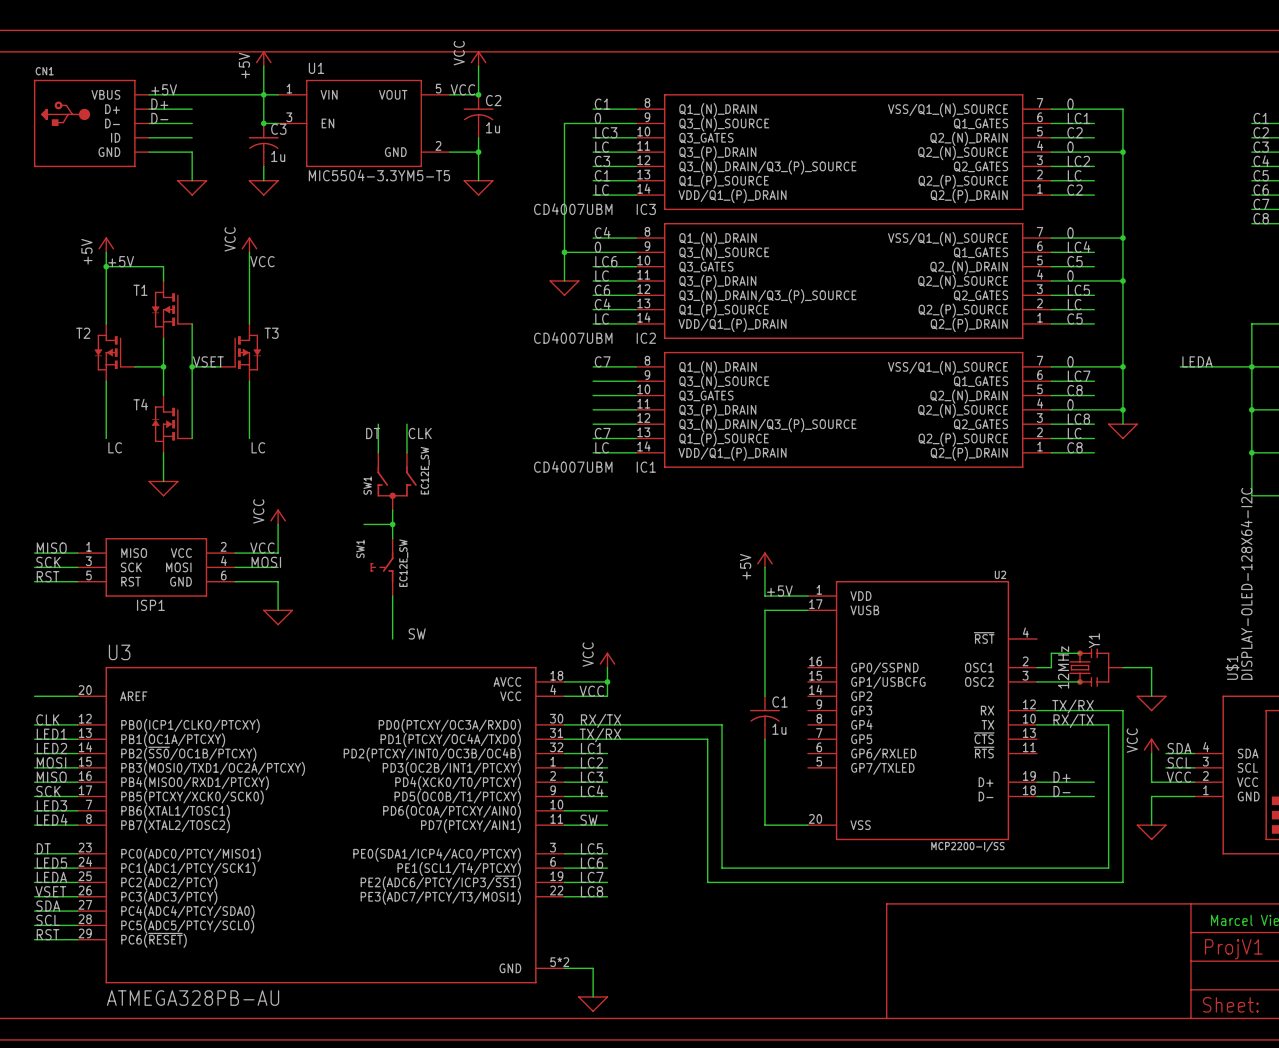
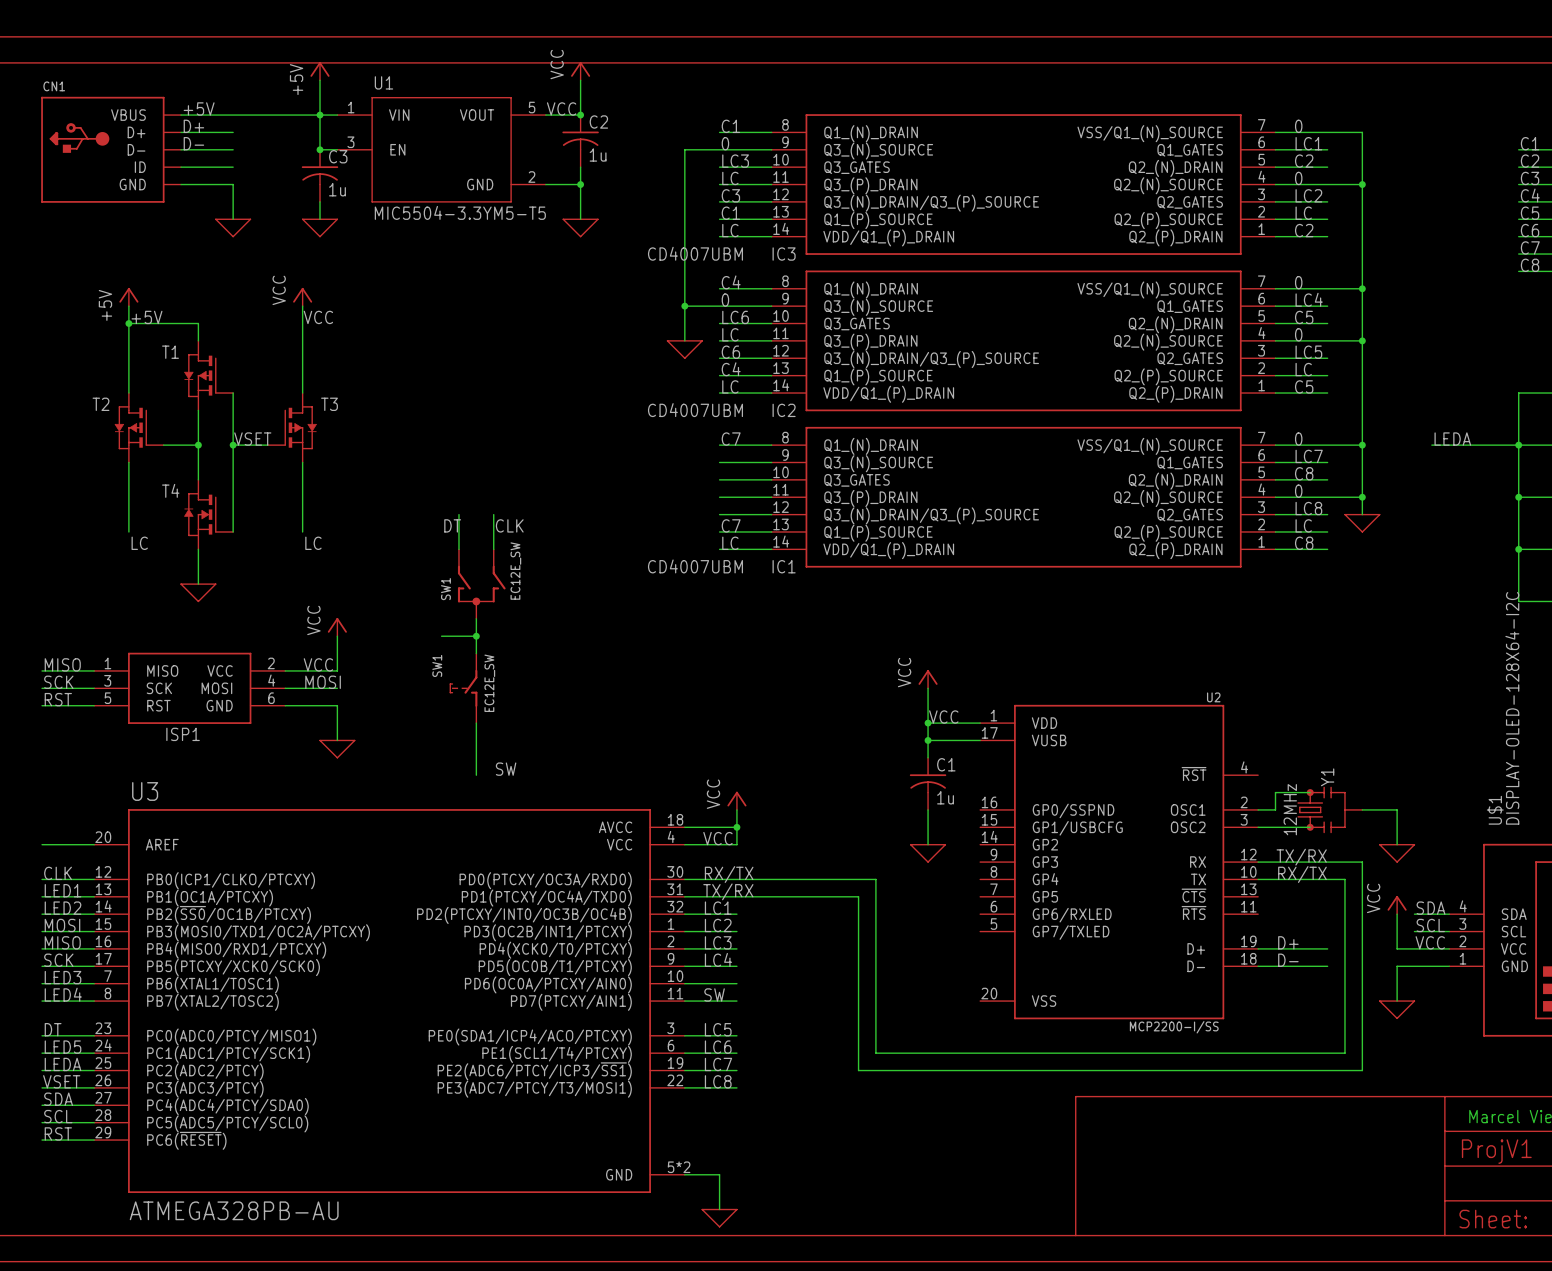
power symbol: +5V (764, 559) -> VCC (928, 679)
label: +5V (779, 591) -> VCC (943, 717)
wire: none -> (928, 723) (928, 740)
junction: none -> (928, 723)
junction: none -> (928, 740)
power symbol: none -> (928, 853)
C1 position: (764, 717) -> (928, 783)
wire: (764, 739) (764, 825) (807, 825) -> none

